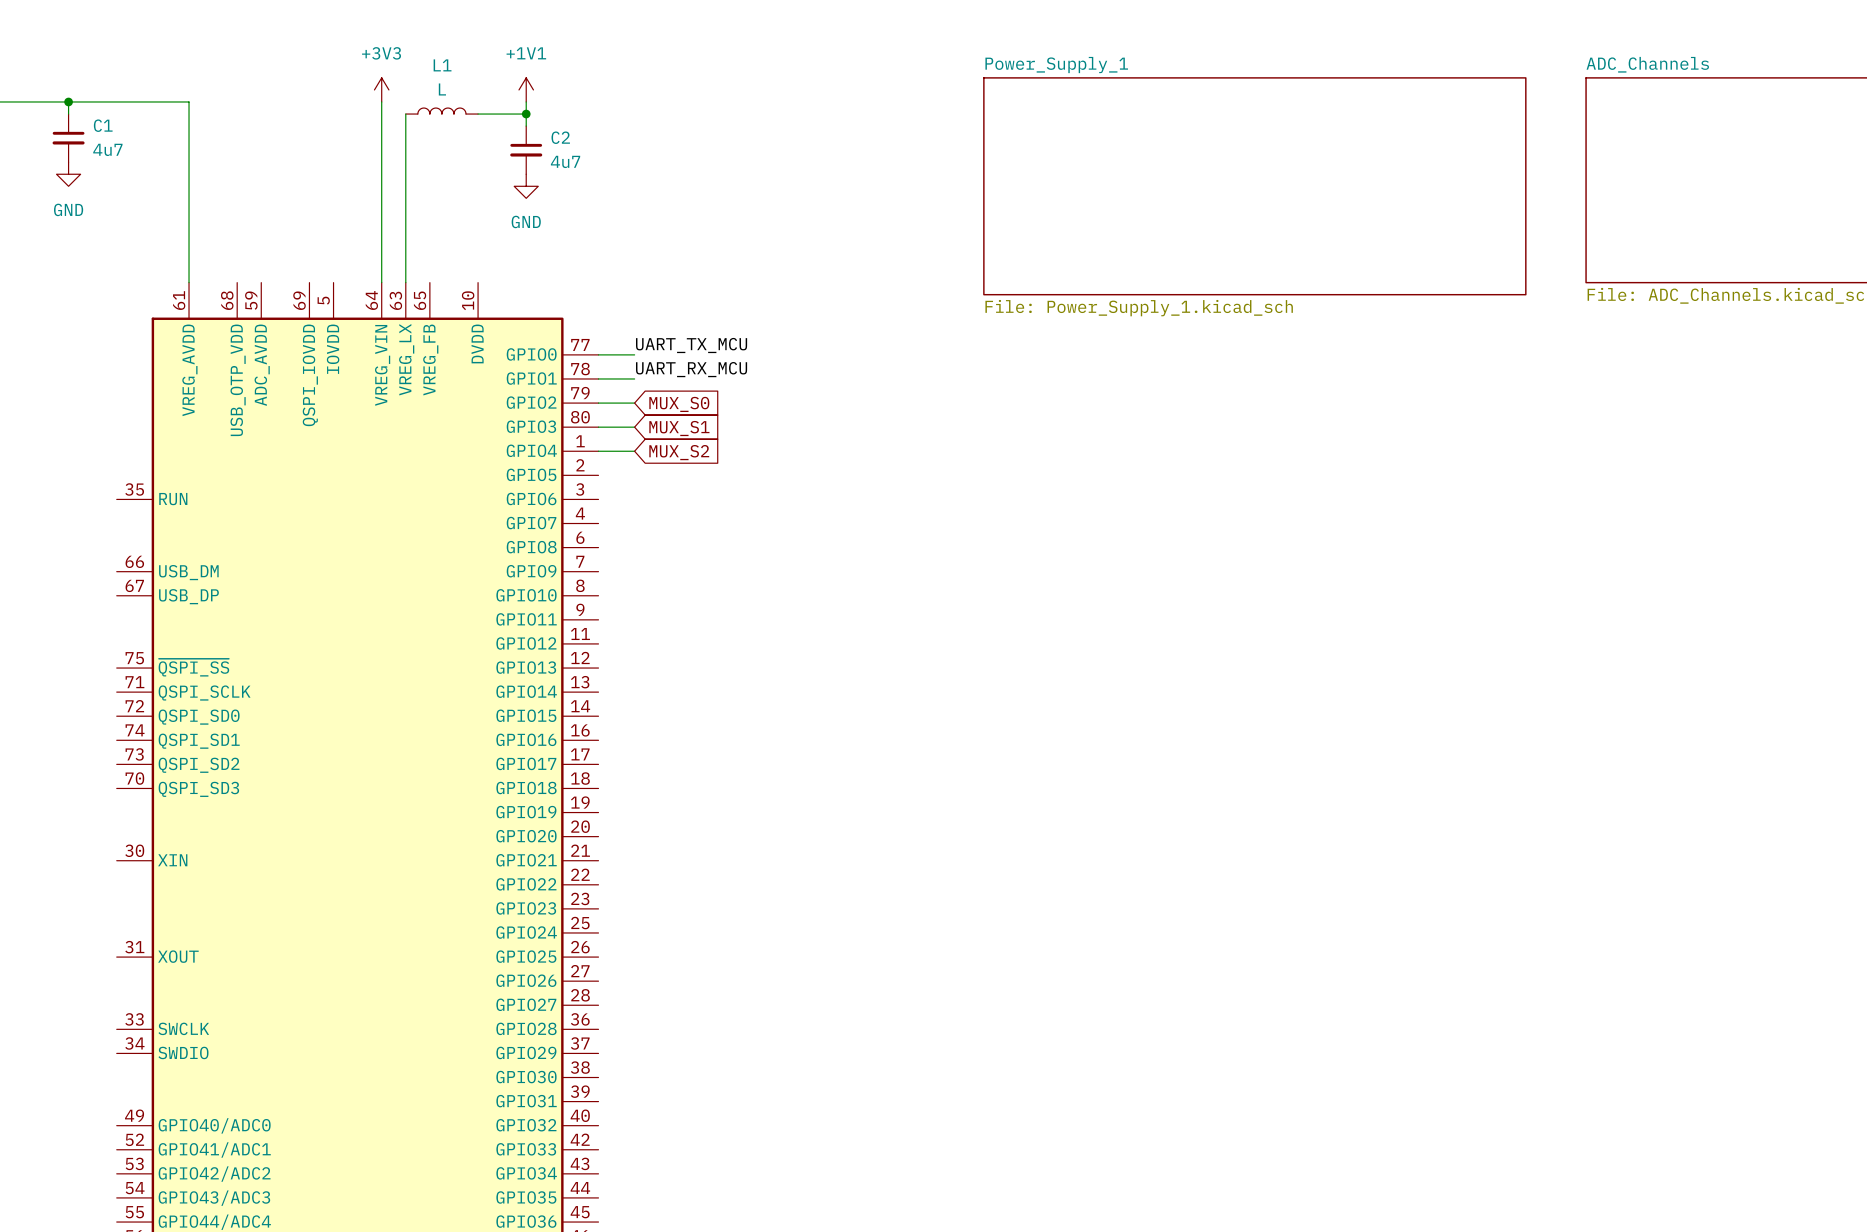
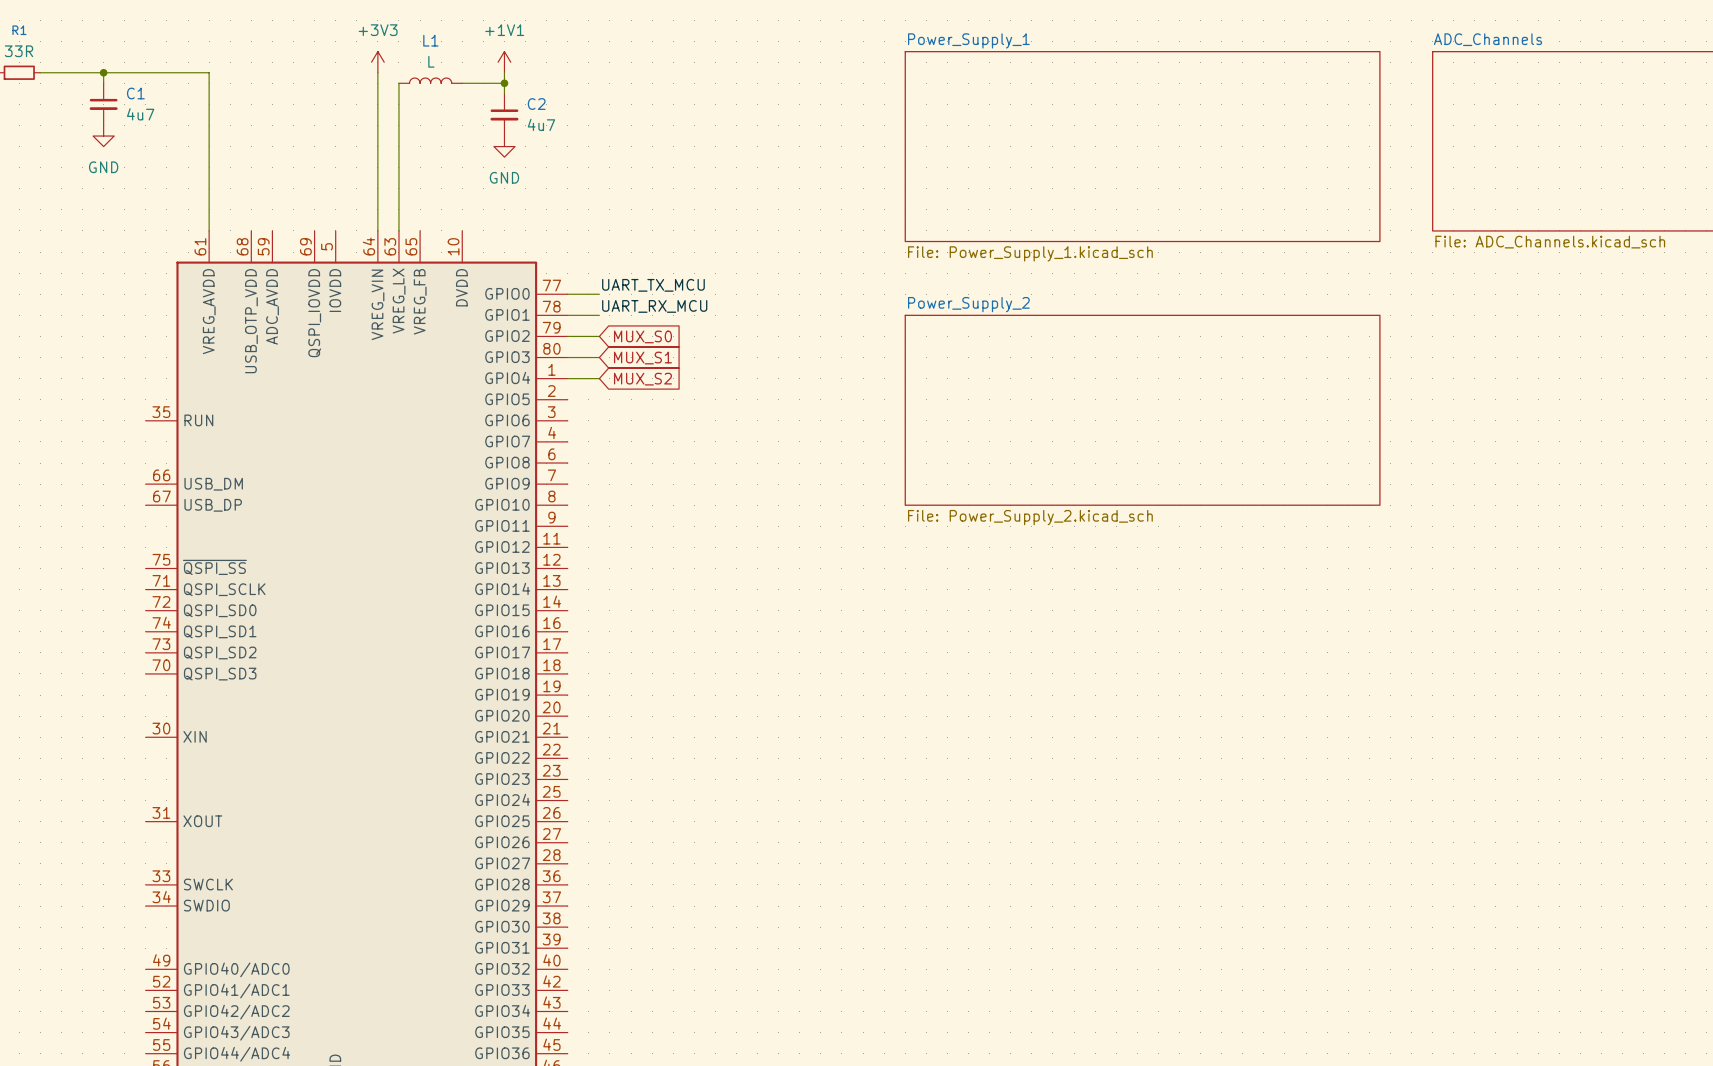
sheet Power_Supply_2: none -> File: Power_Supply_2.kicad_sch (1142, 410)

